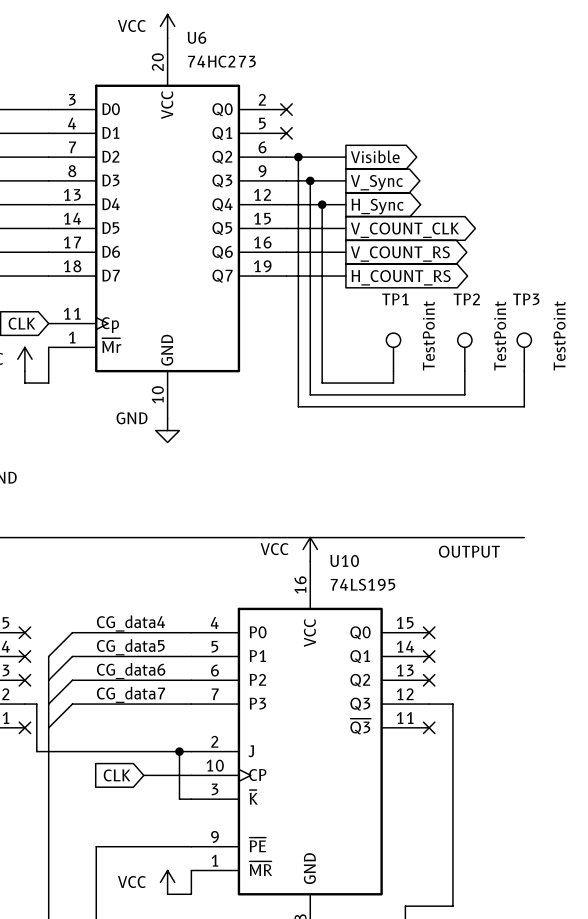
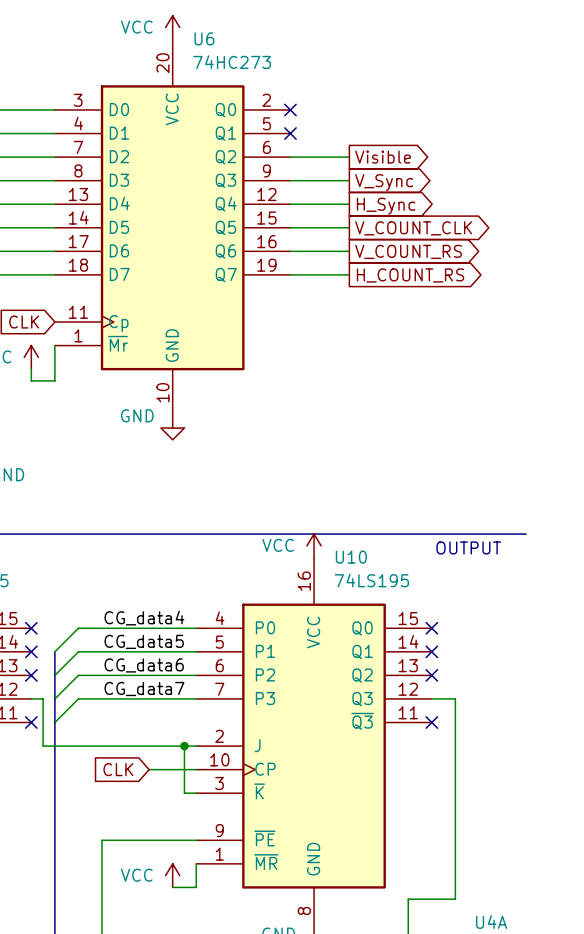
wire: (298, 157) (298, 406) (524, 406) (524, 371) -> none
junction: (298, 157) -> none
wire: (310, 180) (310, 394) (464, 394) (464, 371) -> none
junction: (310, 180) -> none
wire: (322, 204) (322, 383) (393, 383) (393, 371) -> none
junction: (322, 204) -> none
TP1: TestPoint (393, 352) -> none
TP2: TestPoint (464, 352) -> none
TP3: TestPoint (524, 352) -> none

